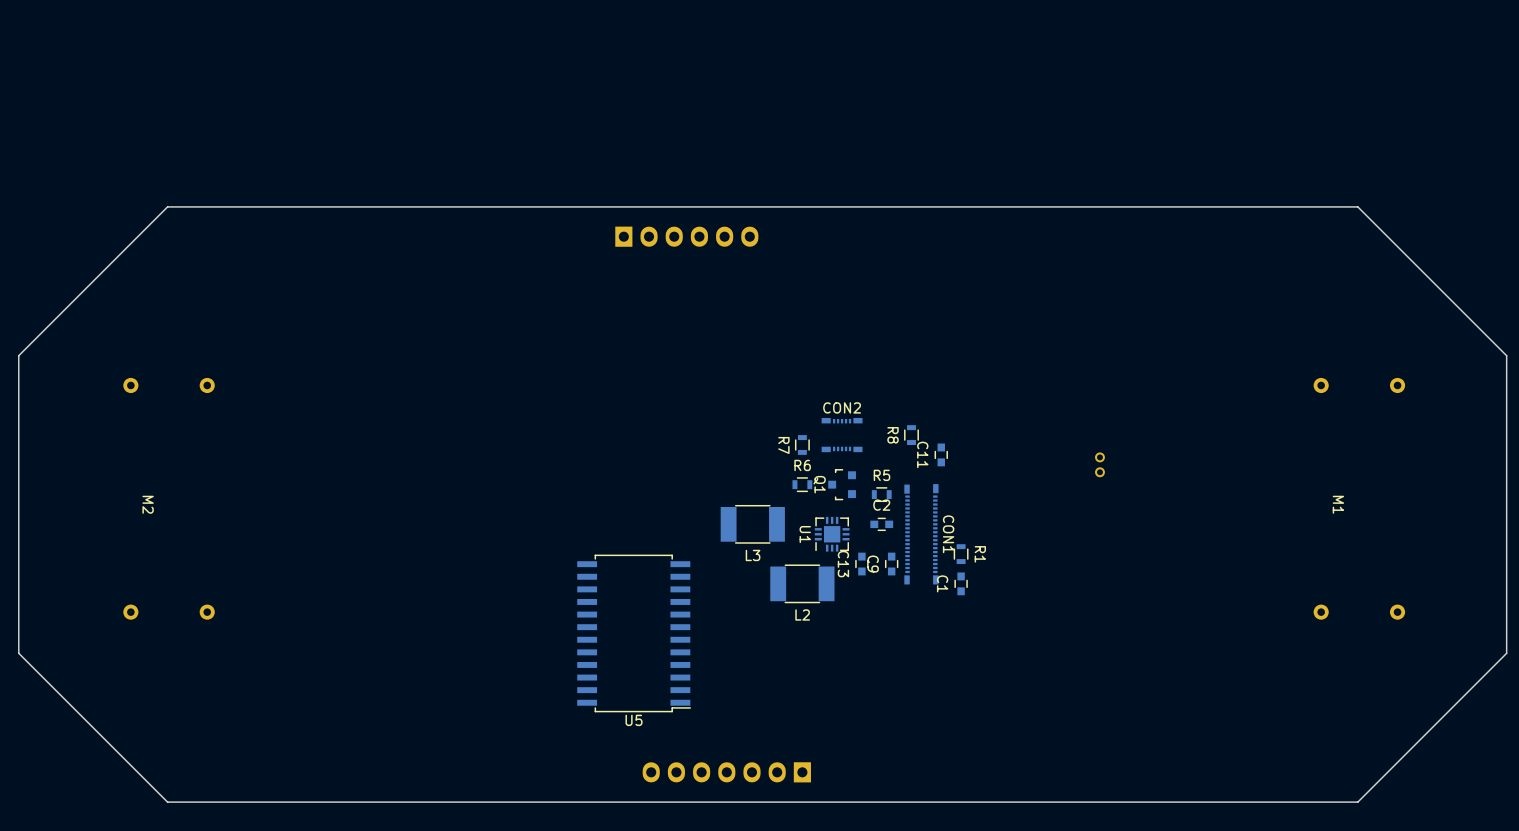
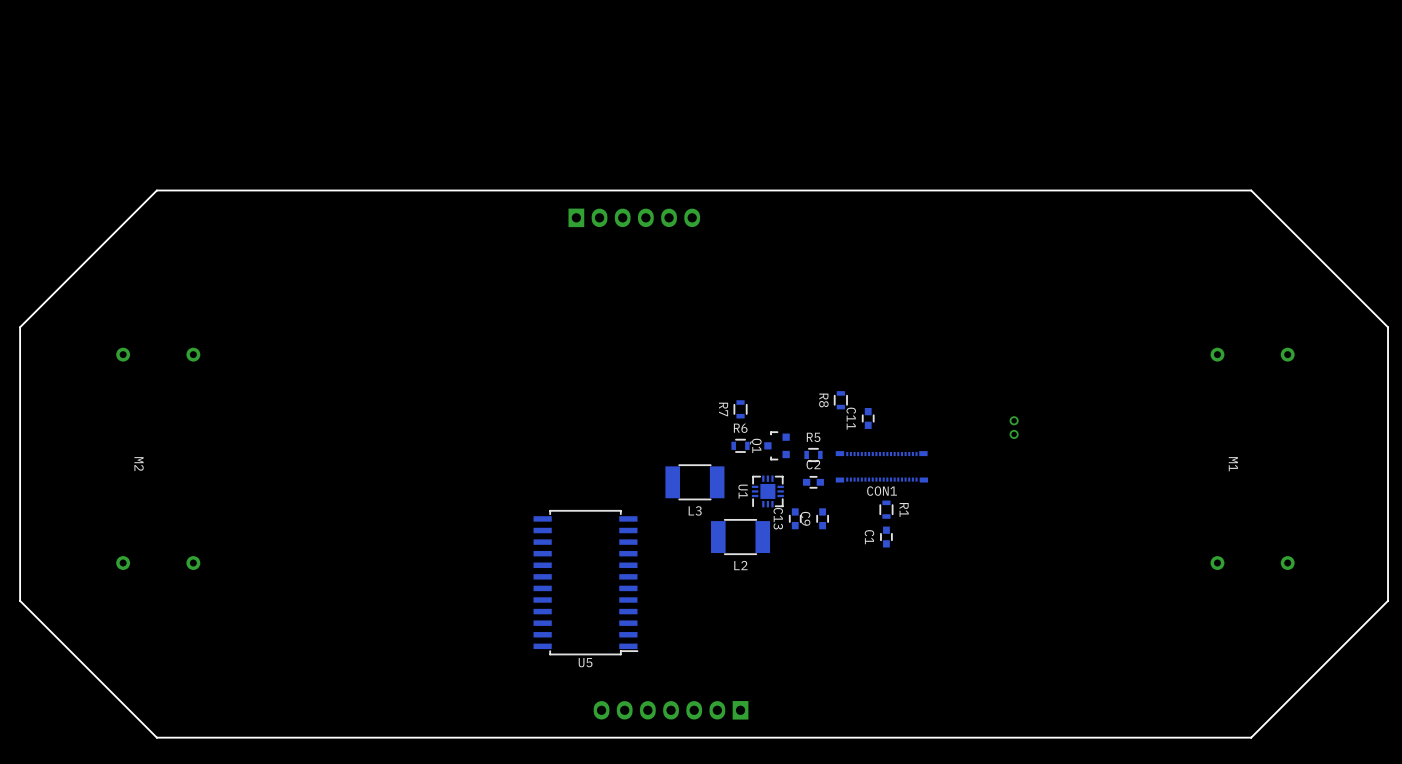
CON2: (842, 435) -> none
CON1 rotation: 0° (921, 534) -> 90° clockwise (881, 466)

